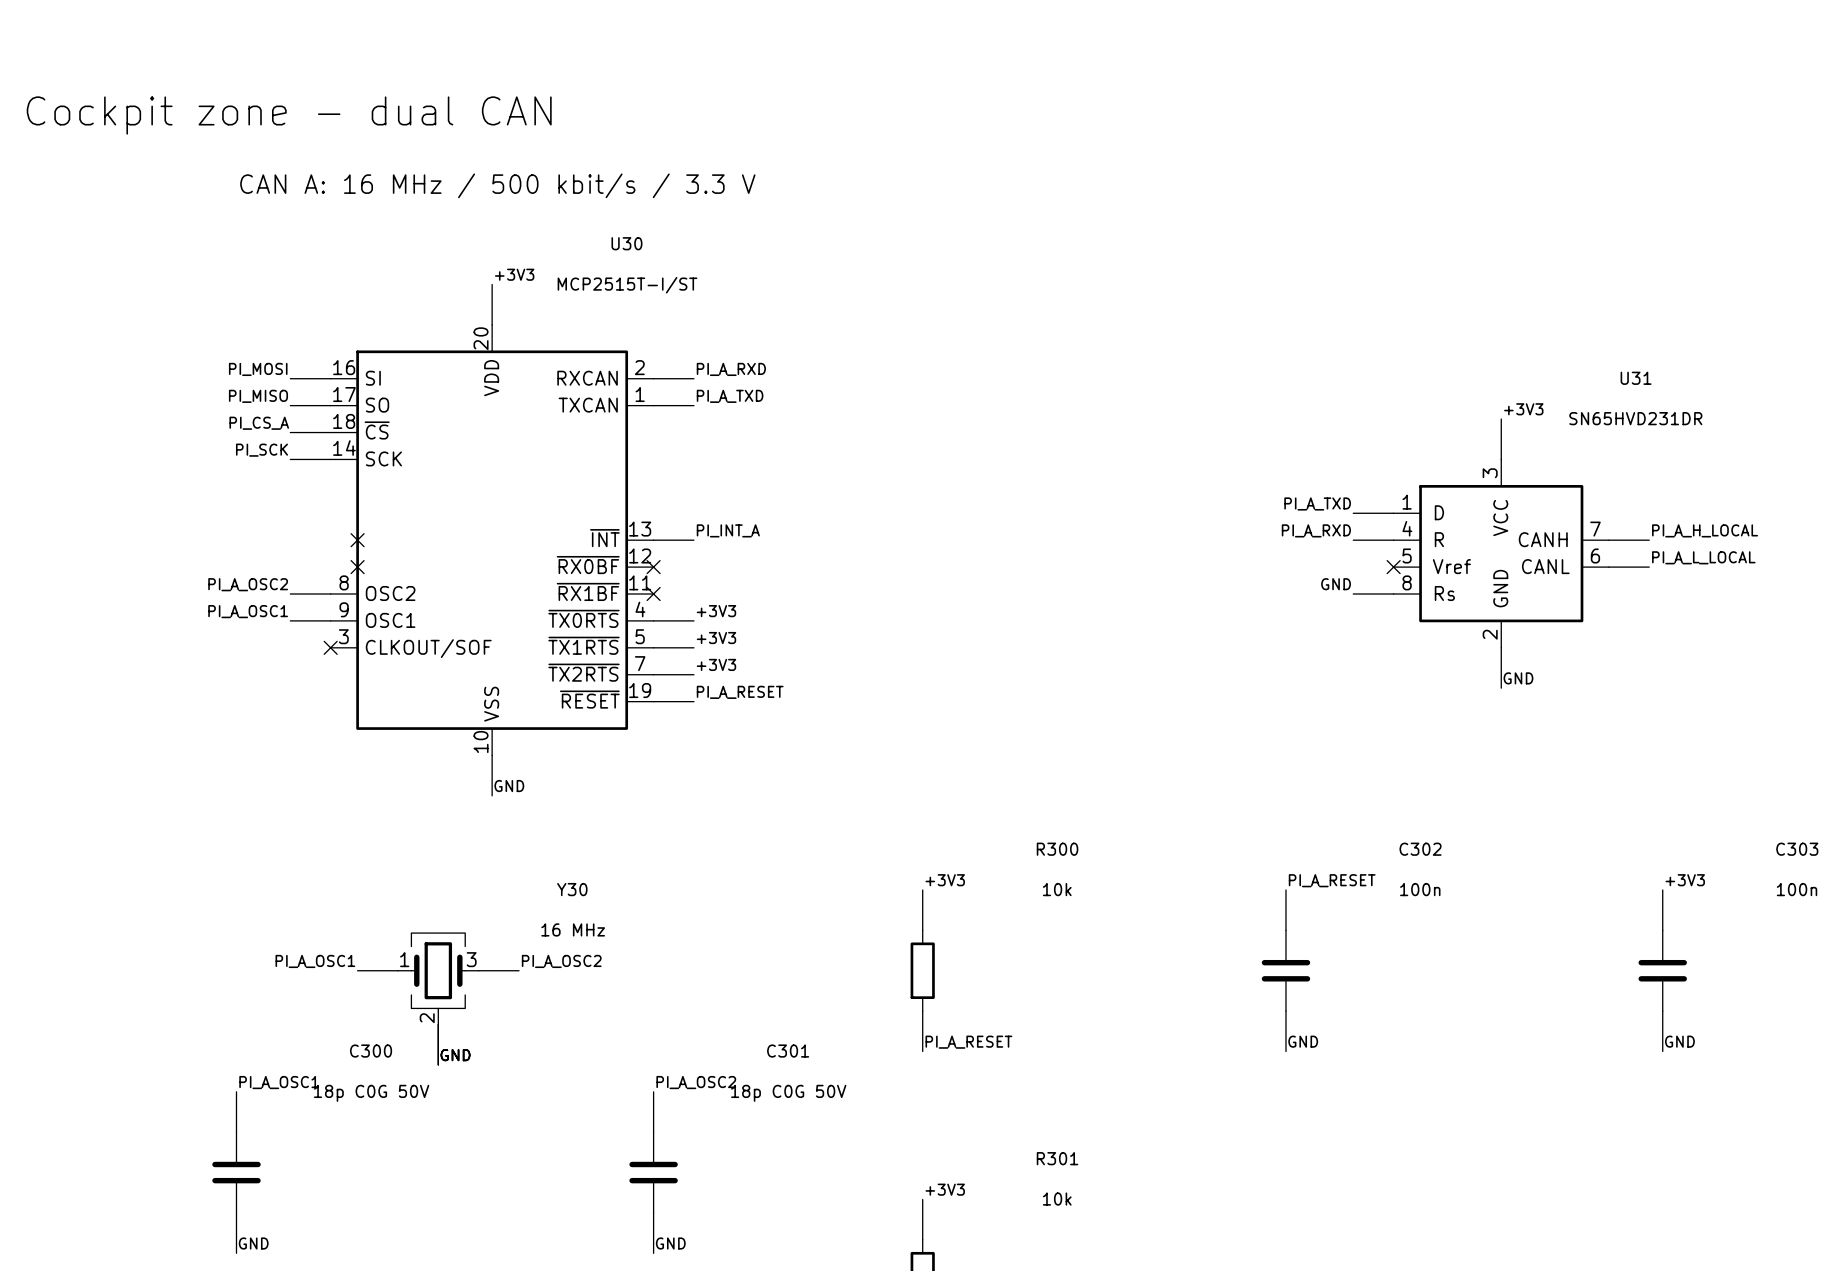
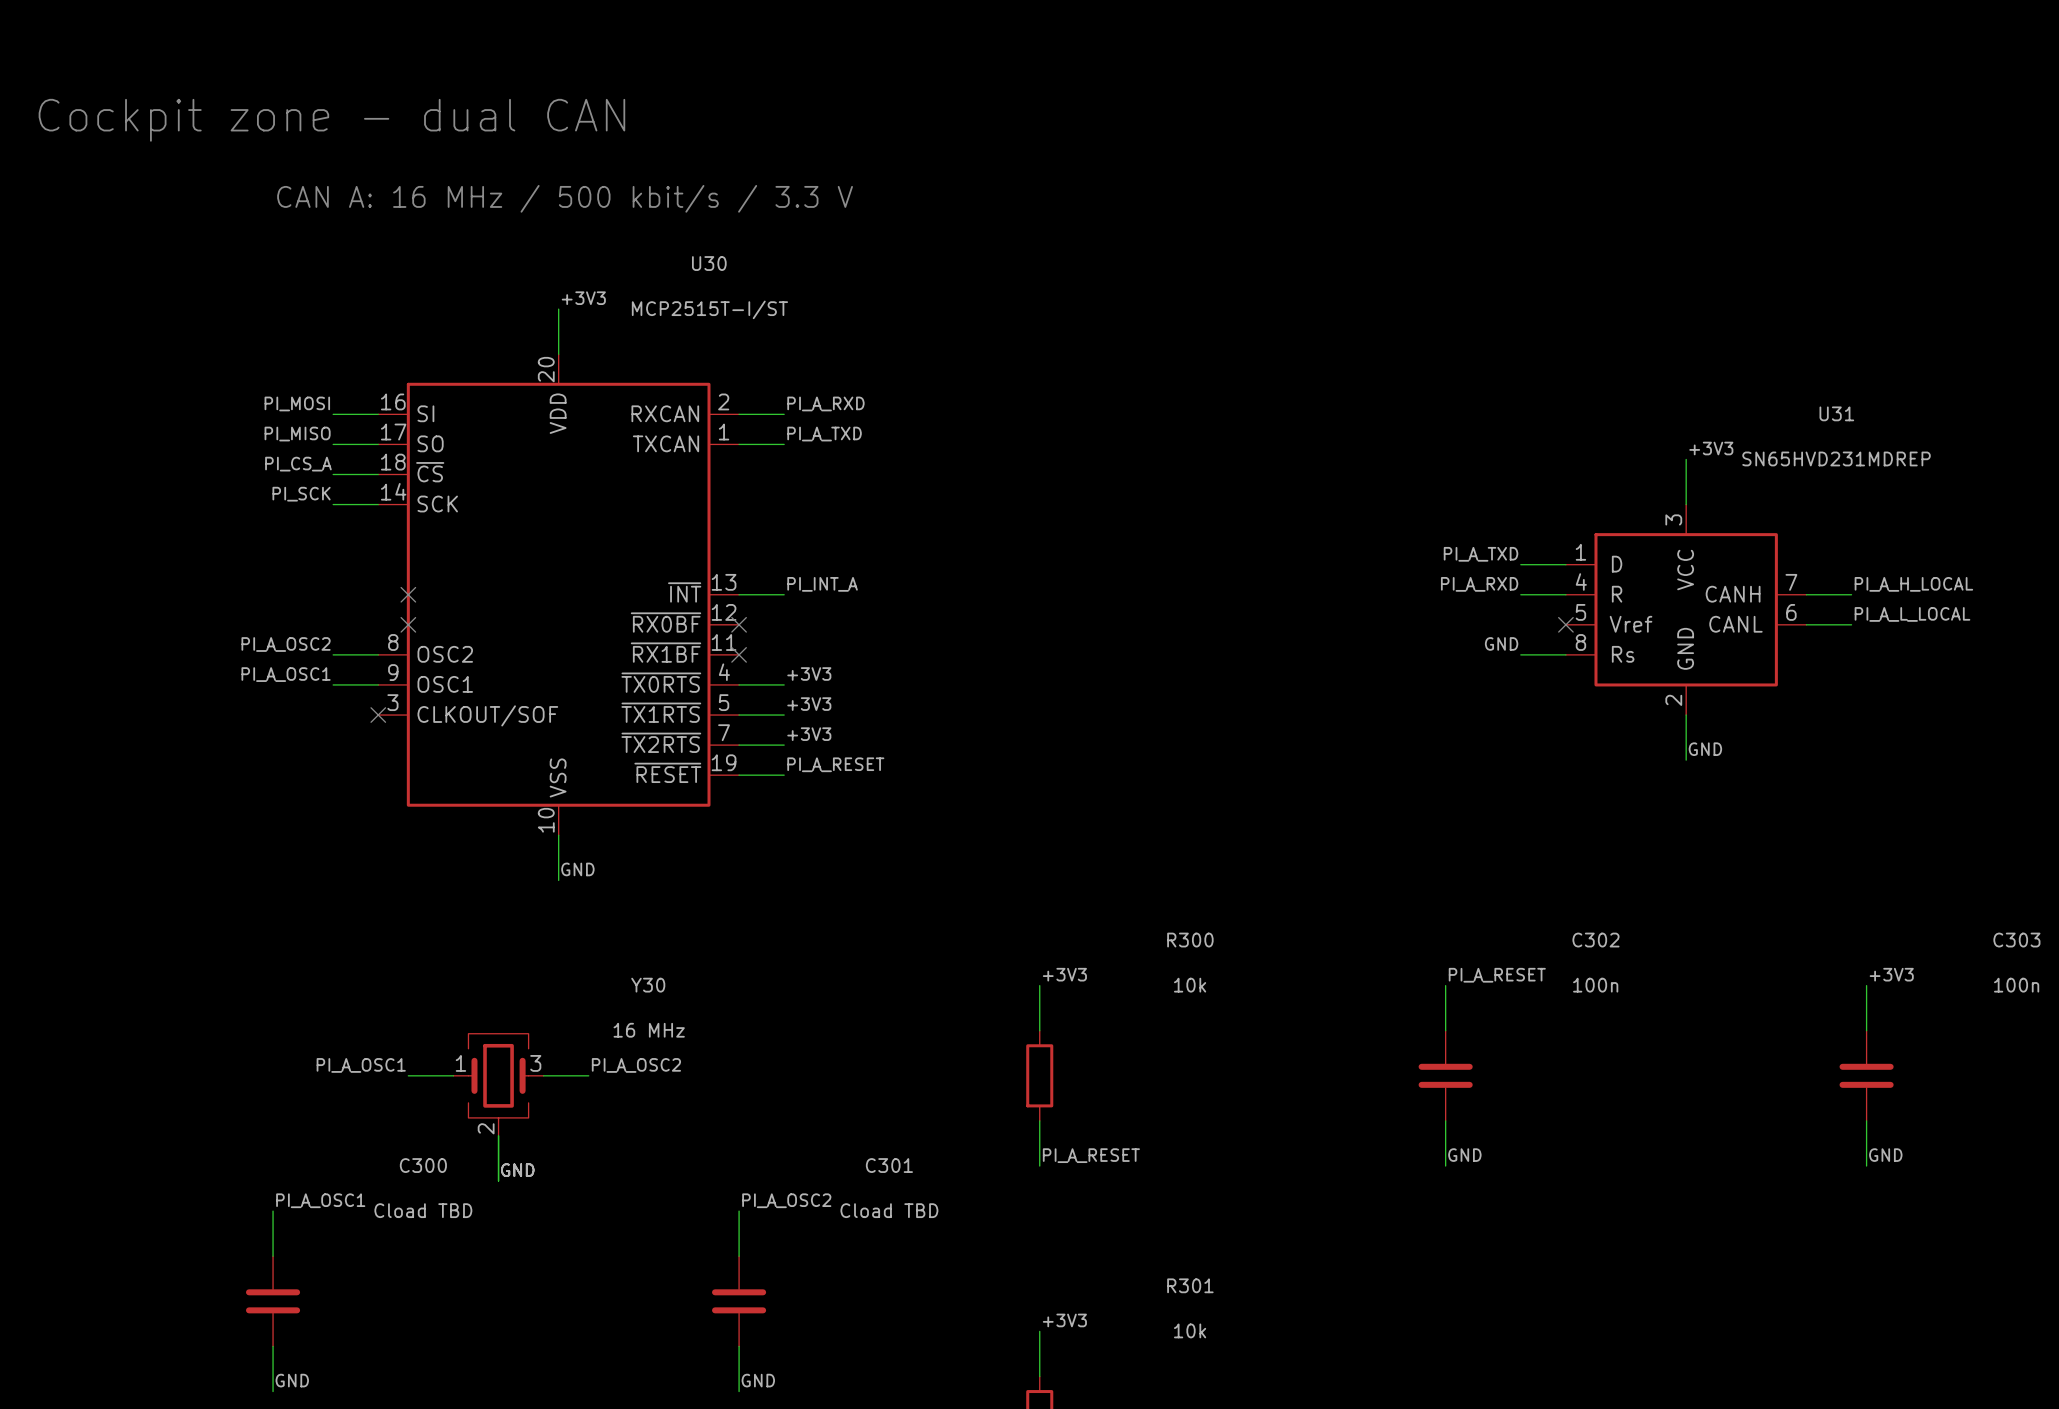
U31 value: SN65HVD231DR (1635, 418) -> SN65HVD231MDREP (1836, 458)
C300 value: 18p C0G 50V (371, 1093) -> Cload TBD (423, 1210)
C301 value: 18p C0G 50V (788, 1093) -> Cload TBD (889, 1210)

